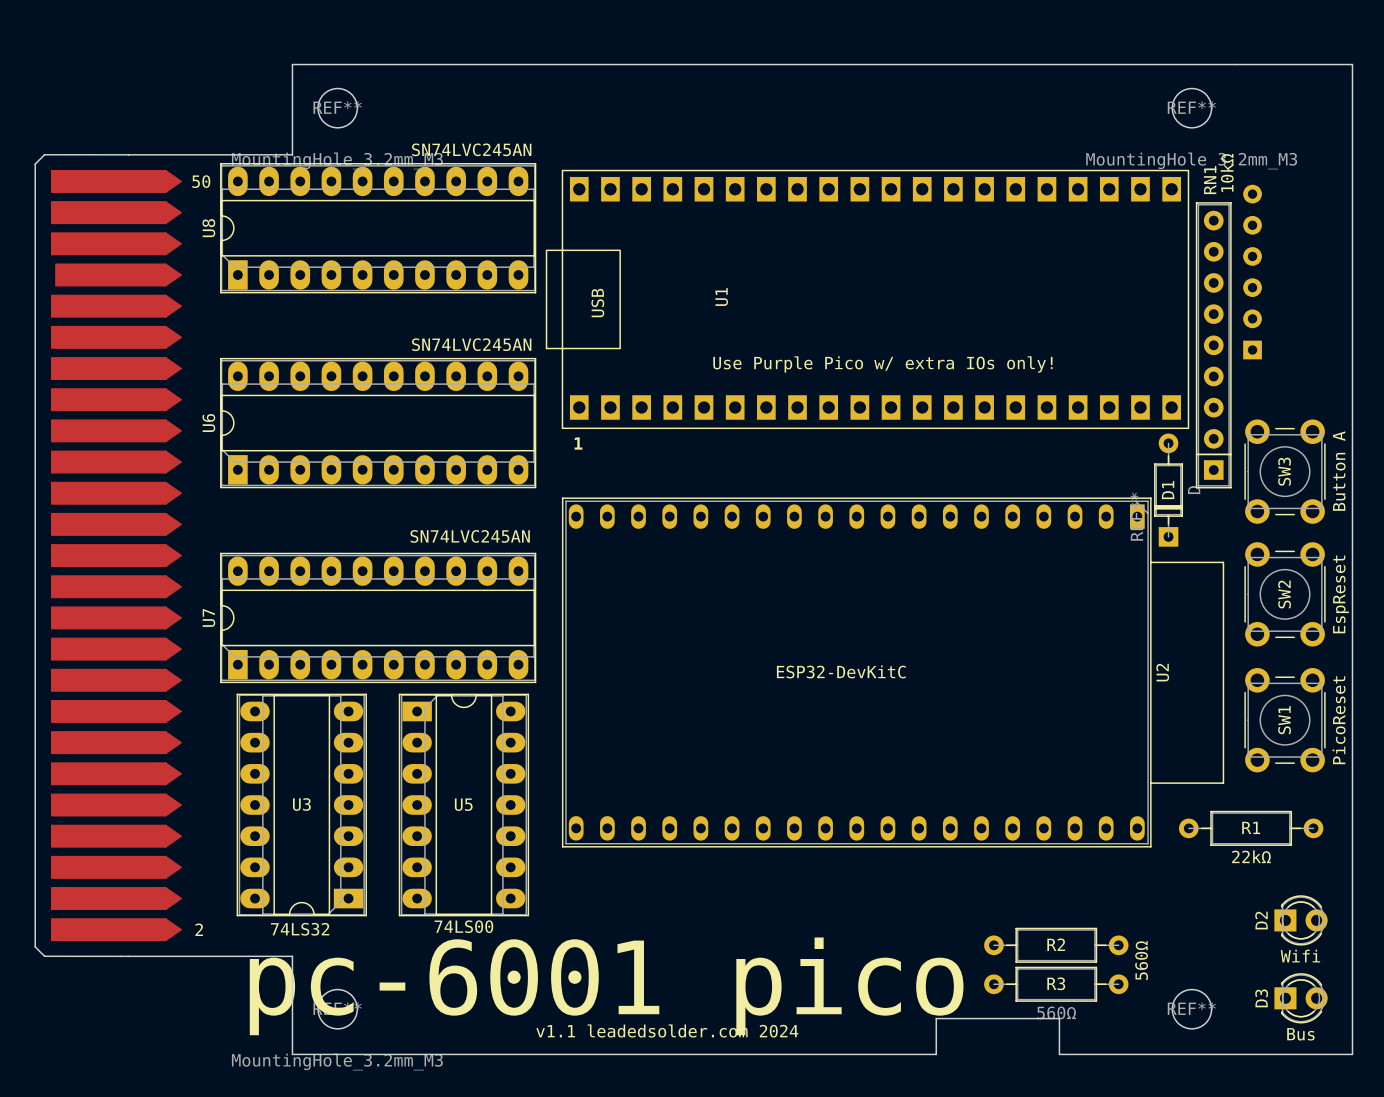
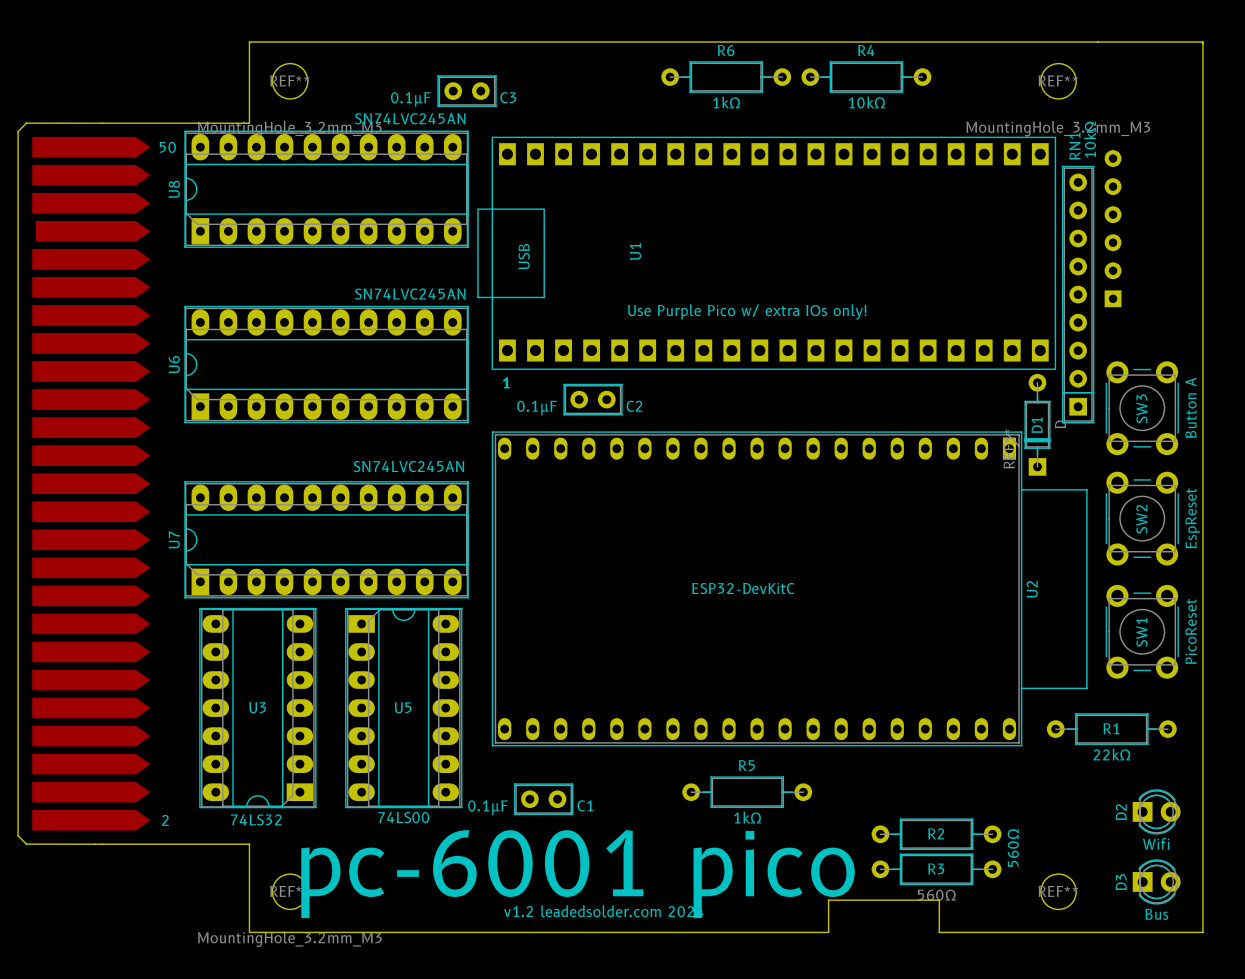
R6: none -> 1kΩ (726, 77)
R4: none -> 10kΩ (866, 77)
C3: none -> 0.1µF (467, 91)
C2: none -> 0.1µF (593, 399)
R5: none -> 1kΩ (747, 792)
C1: none -> 0.1µF (543, 799)
text: v1.1 leadedsolder.com 2024 (667, 1031) -> v1.2 leadedsolder.com 2024 (603, 911)

